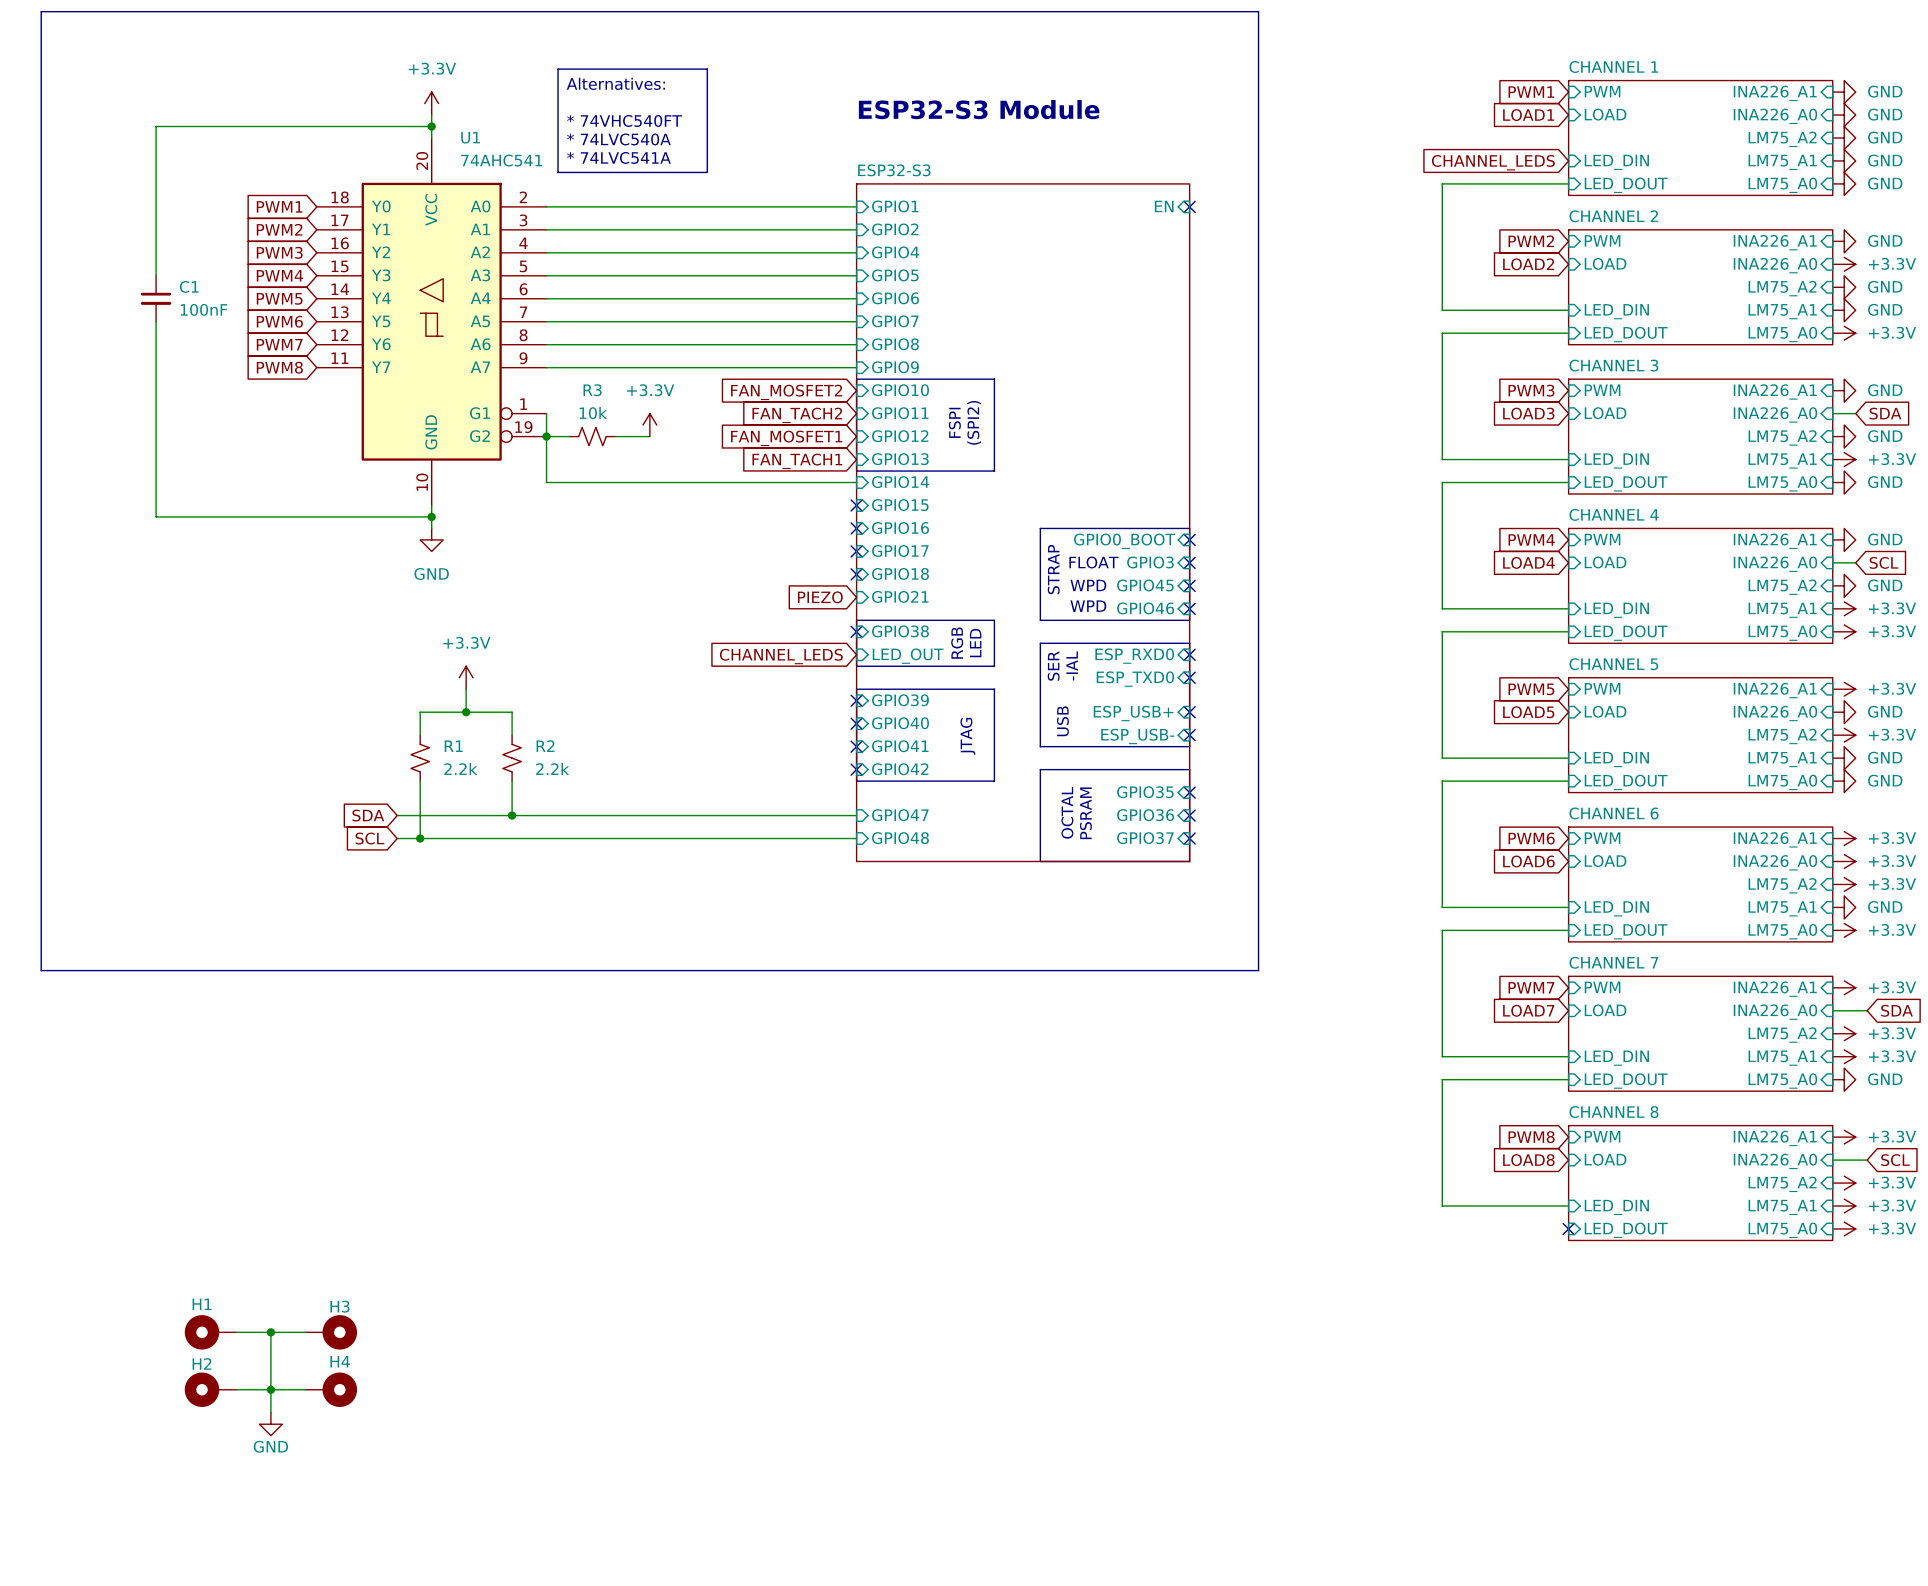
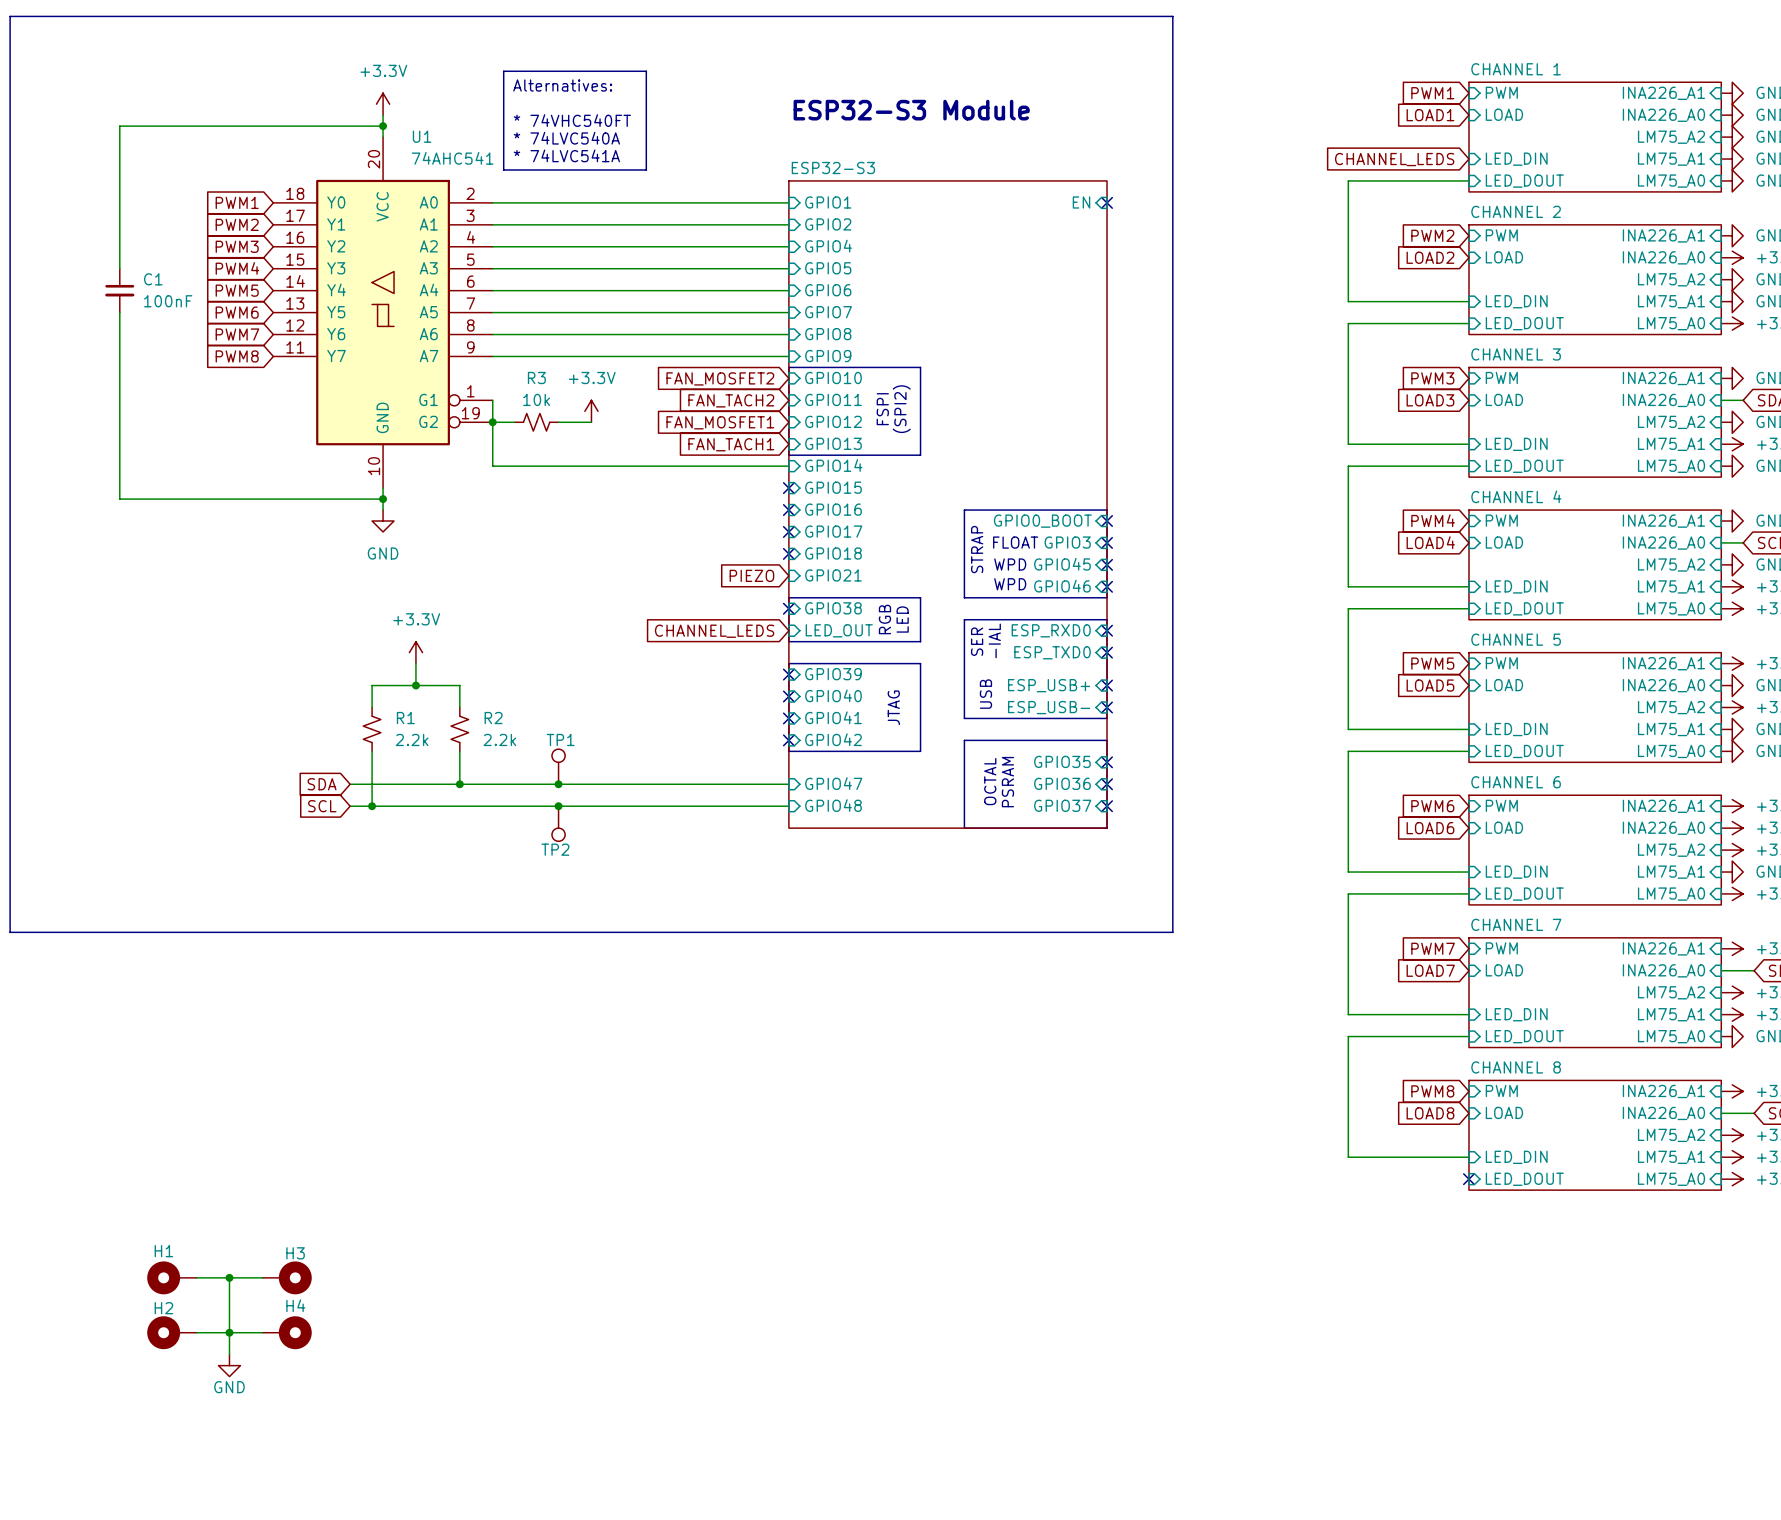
TP1: none -> (558, 766)
junction: none -> (558, 784)
junction: none -> (558, 806)
TP2: none -> (558, 823)

